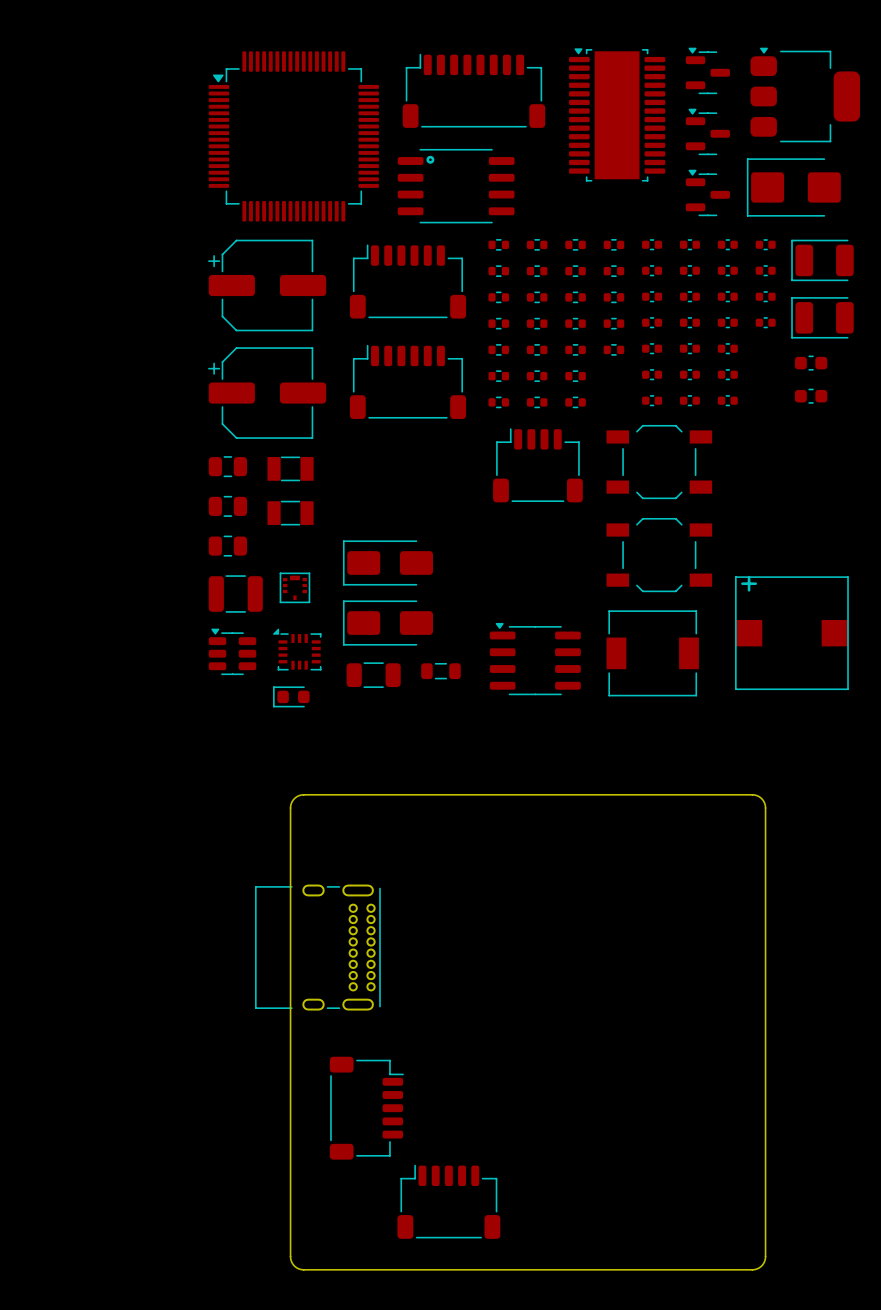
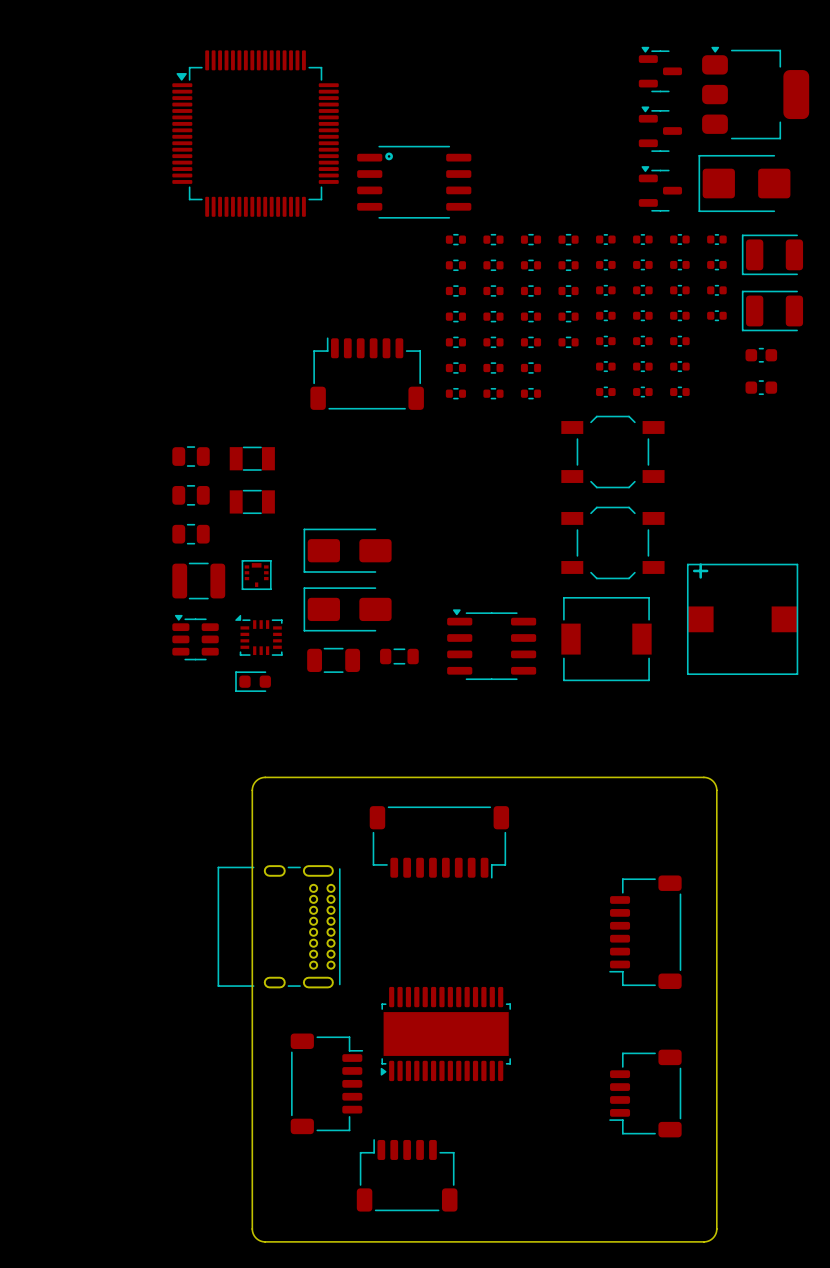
part: (473, 90) -> none
part: (617, 114) -> none
part: (407, 281) -> none
part: (267, 285) -> none
part: (267, 393) -> none
part: (537, 465) -> none
part: none -> (439, 842)
part: none -> (645, 932)
part: none -> (445, 1034)
part: none -> (645, 1093)

